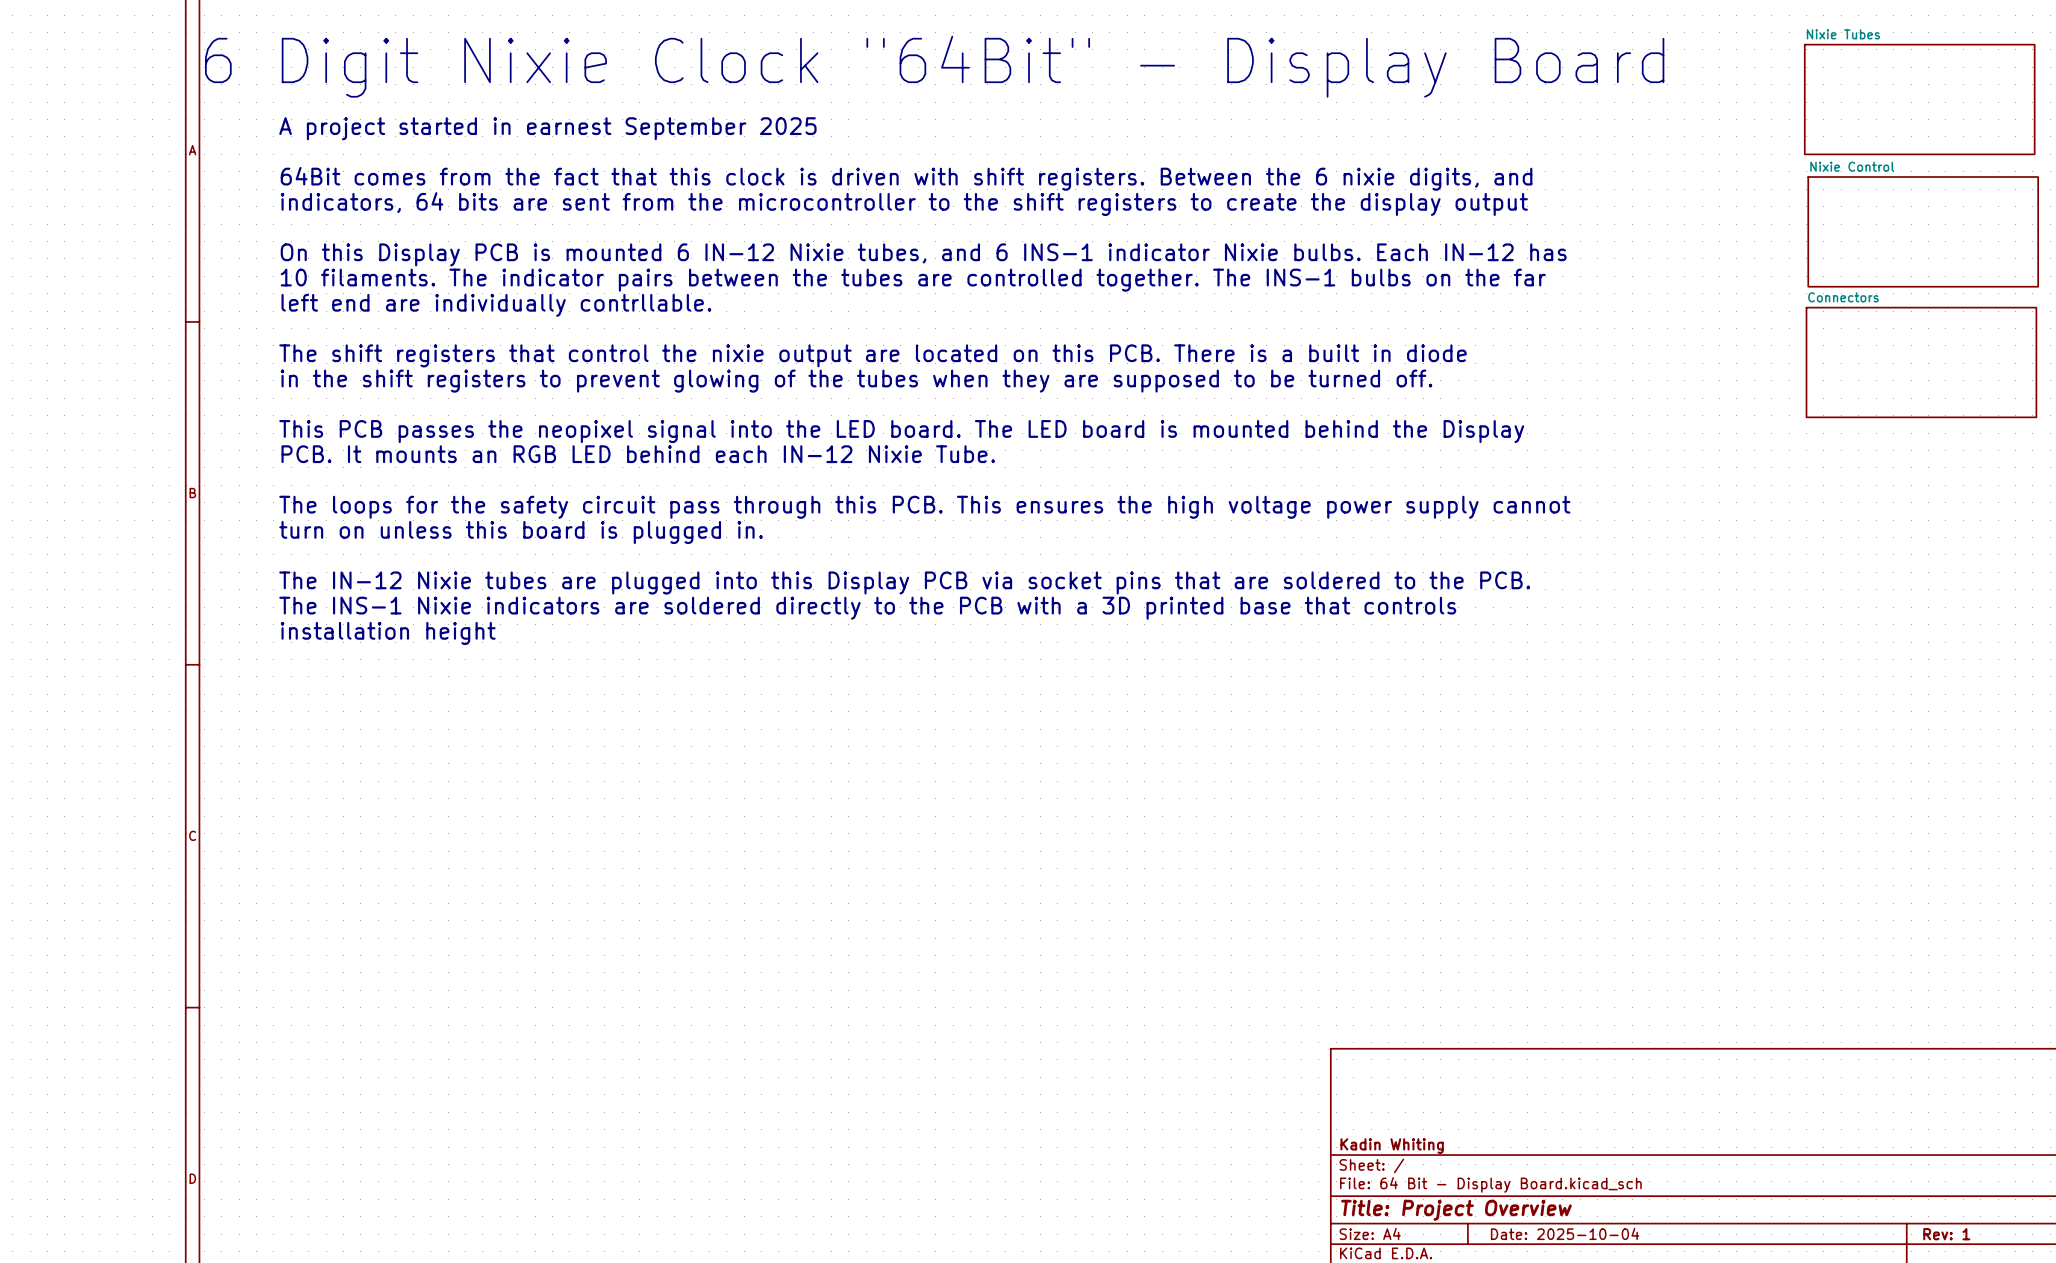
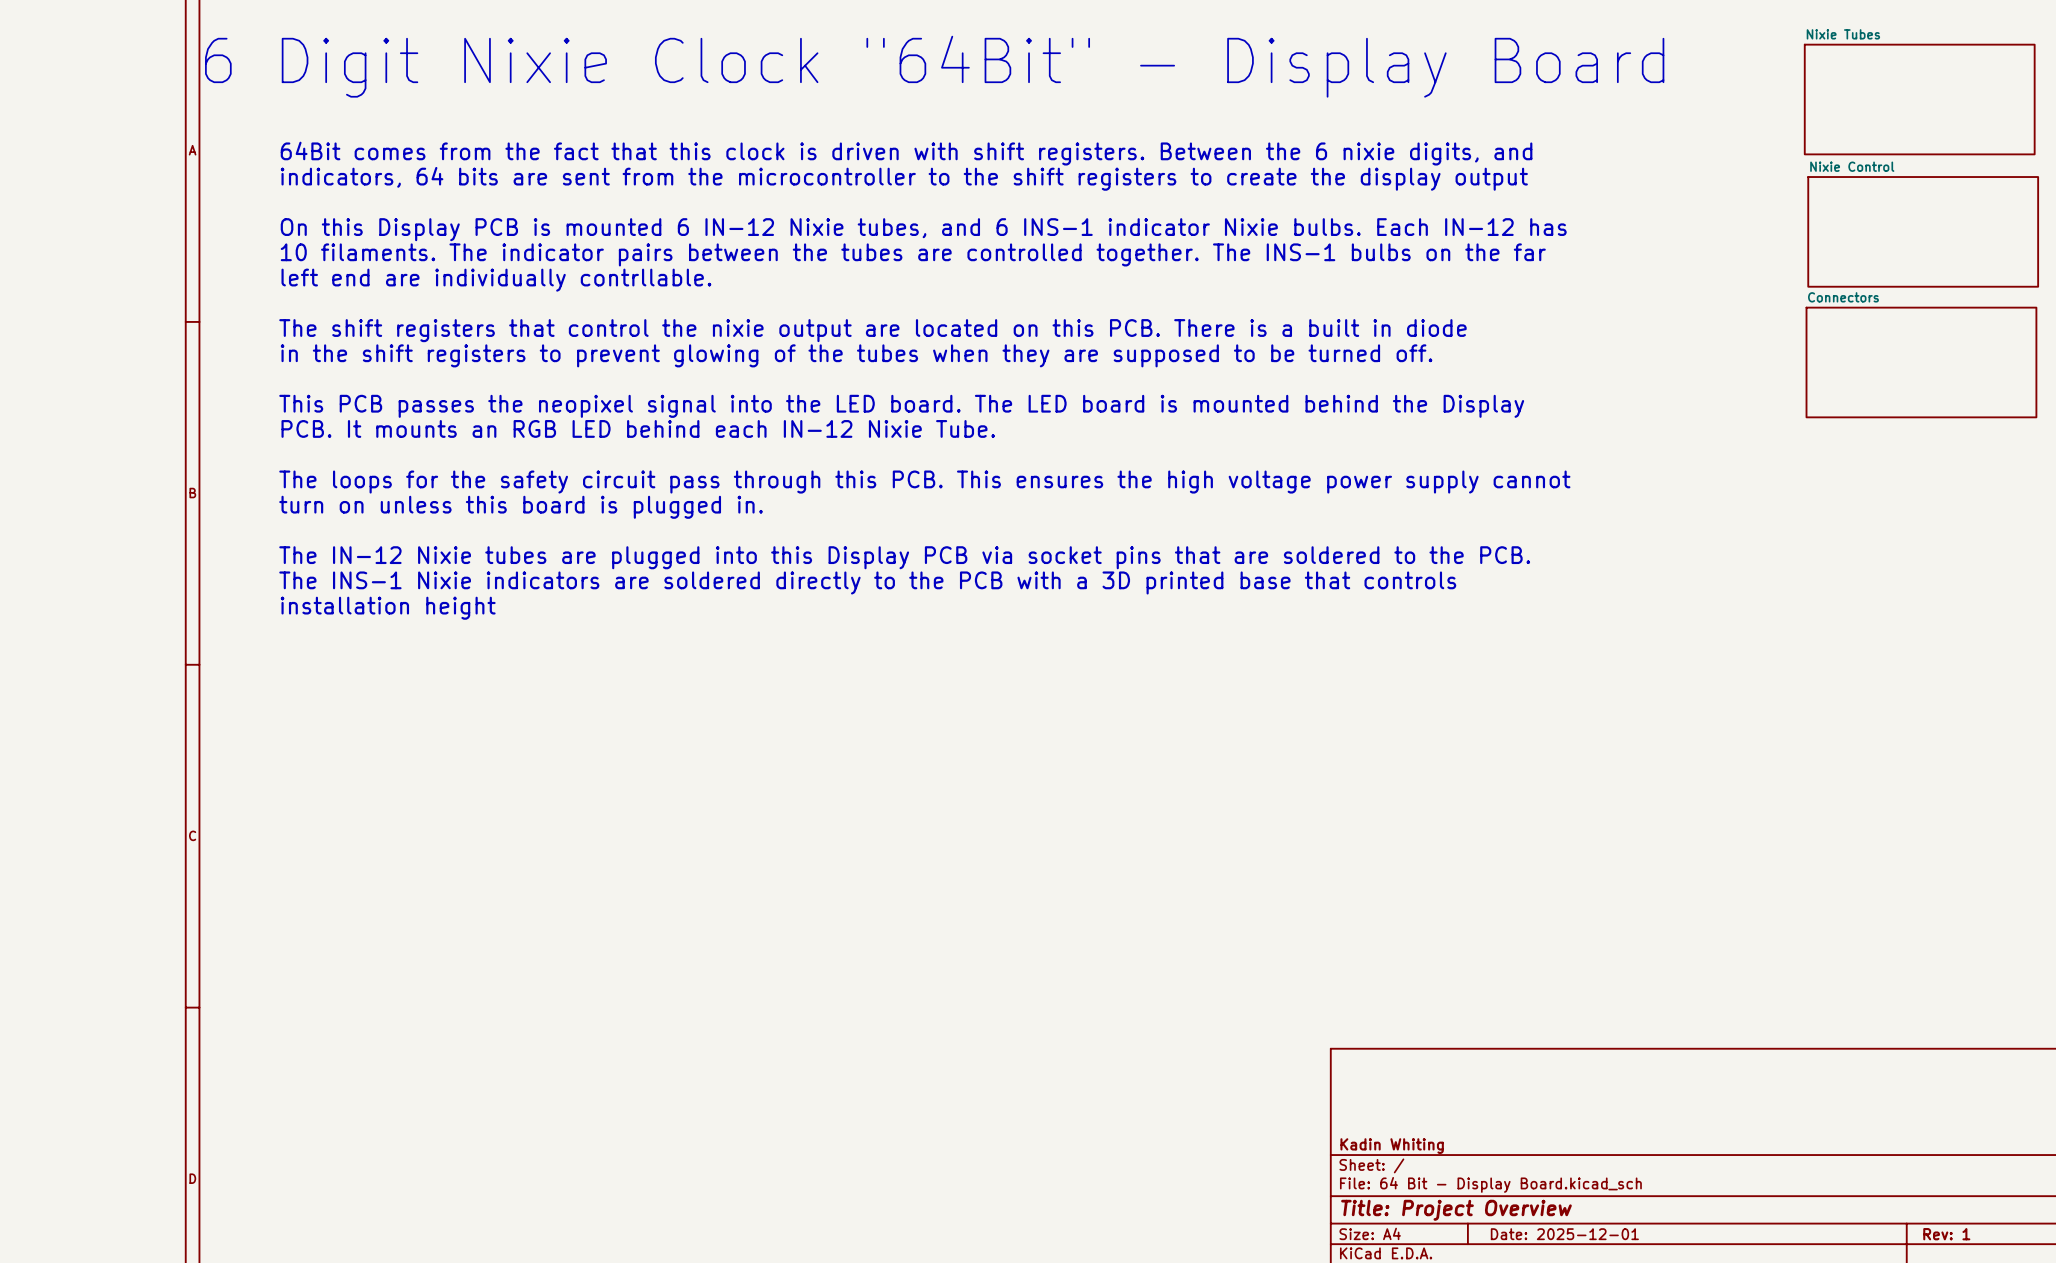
text: A project started in earnest September 2025 (547, 128) -> none
text: none -> 64Bit comes from the fact that this clock is driven with shift registers. Between the 6 nixie digits, and (906, 153)
text: 64Bit comes from the fact that this clock is driven with shift registers. Between the 6 nixie digits, and (906, 178) -> indicators, 64 bits are sent from the microcontroller to the shift registers to create the display output (904, 178)
text: indicators, 64 bits are sent from the microcontroller to the shift registers to create the display output (904, 204) -> none
text: none -> On this Display PCB is mounted 6 IN-12 Nixie tubes, and 6 INS-1 indicator Nixie bulbs. Each IN-12 has (923, 229)
text: On this Display PCB is mounted 6 IN-12 Nixie tubes, and 6 INS-1 indicator Nixie bulbs. Each IN-12 has (923, 254) -> 10 filaments. The indicator pairs between the tubes are controlled together. The INS-1 bulbs on the far (913, 254)
text: 10 filaments. The indicator pairs between the tubes are controlled together. The INS-1 bulbs on the far (913, 280) -> left end are individually contrllable. (496, 280)
text: left end are individually contrllable. (496, 305) -> none
text: none -> The shift registers that control the nixie output are located on this PCB. There is a built in diode (872, 330)
text: The shift registers that control the nixie output are located on this PCB. There is a built in diode (872, 355) -> in the shift registers to prevent glowing of the tubes when they are supposed to be turned off. (856, 355)
text: in the shift registers to prevent glowing of the tubes when they are supposed to be turned off. (856, 381) -> none
text: none -> This PCB passes the neopixel signal into the LED board. The LED board is mounted behind the Display (901, 406)
text: This PCB passes the neopixel signal into the LED board. The LED board is mounted behind the Display (901, 431) -> PCB. It mounts an RGB LED behind each IN-12 Nixie Tube. (638, 428)
text: PCB. It mounts an RGB LED behind each IN-12 Nixie Tube. (638, 454) -> none
text: none -> The loops for the safety circuit pass through this PCB. This ensures the high voltage power supply cannot (924, 482)
text: The loops for the safety circuit pass through this PCB. This ensures the high voltage power supply cannot (924, 507) -> turn on unless this board is plugged in. (521, 507)
text: turn on unless this board is plugged in. (521, 532) -> none
text: none -> The IN-12 Nixie tubes are plugged into this Display PCB via socket pins that are soldered to the PCB. (904, 557)
text: The IN-12 Nixie tubes are plugged into this Display PCB via socket pins that are soldered to the PCB. (904, 582) -> The INS-1 Nixie indicators are soldered directly to the PCB with a 3D printed base that controls (867, 582)
text: The INS-1 Nixie indicators are soldered directly to the PCB with a 3D printed base that controls (867, 608) -> installation height (388, 608)
text: installation height (388, 633) -> none
title block: Date: 2025-10-04 (1565, 1233) -> Date: 2025-12-01 (1564, 1234)

